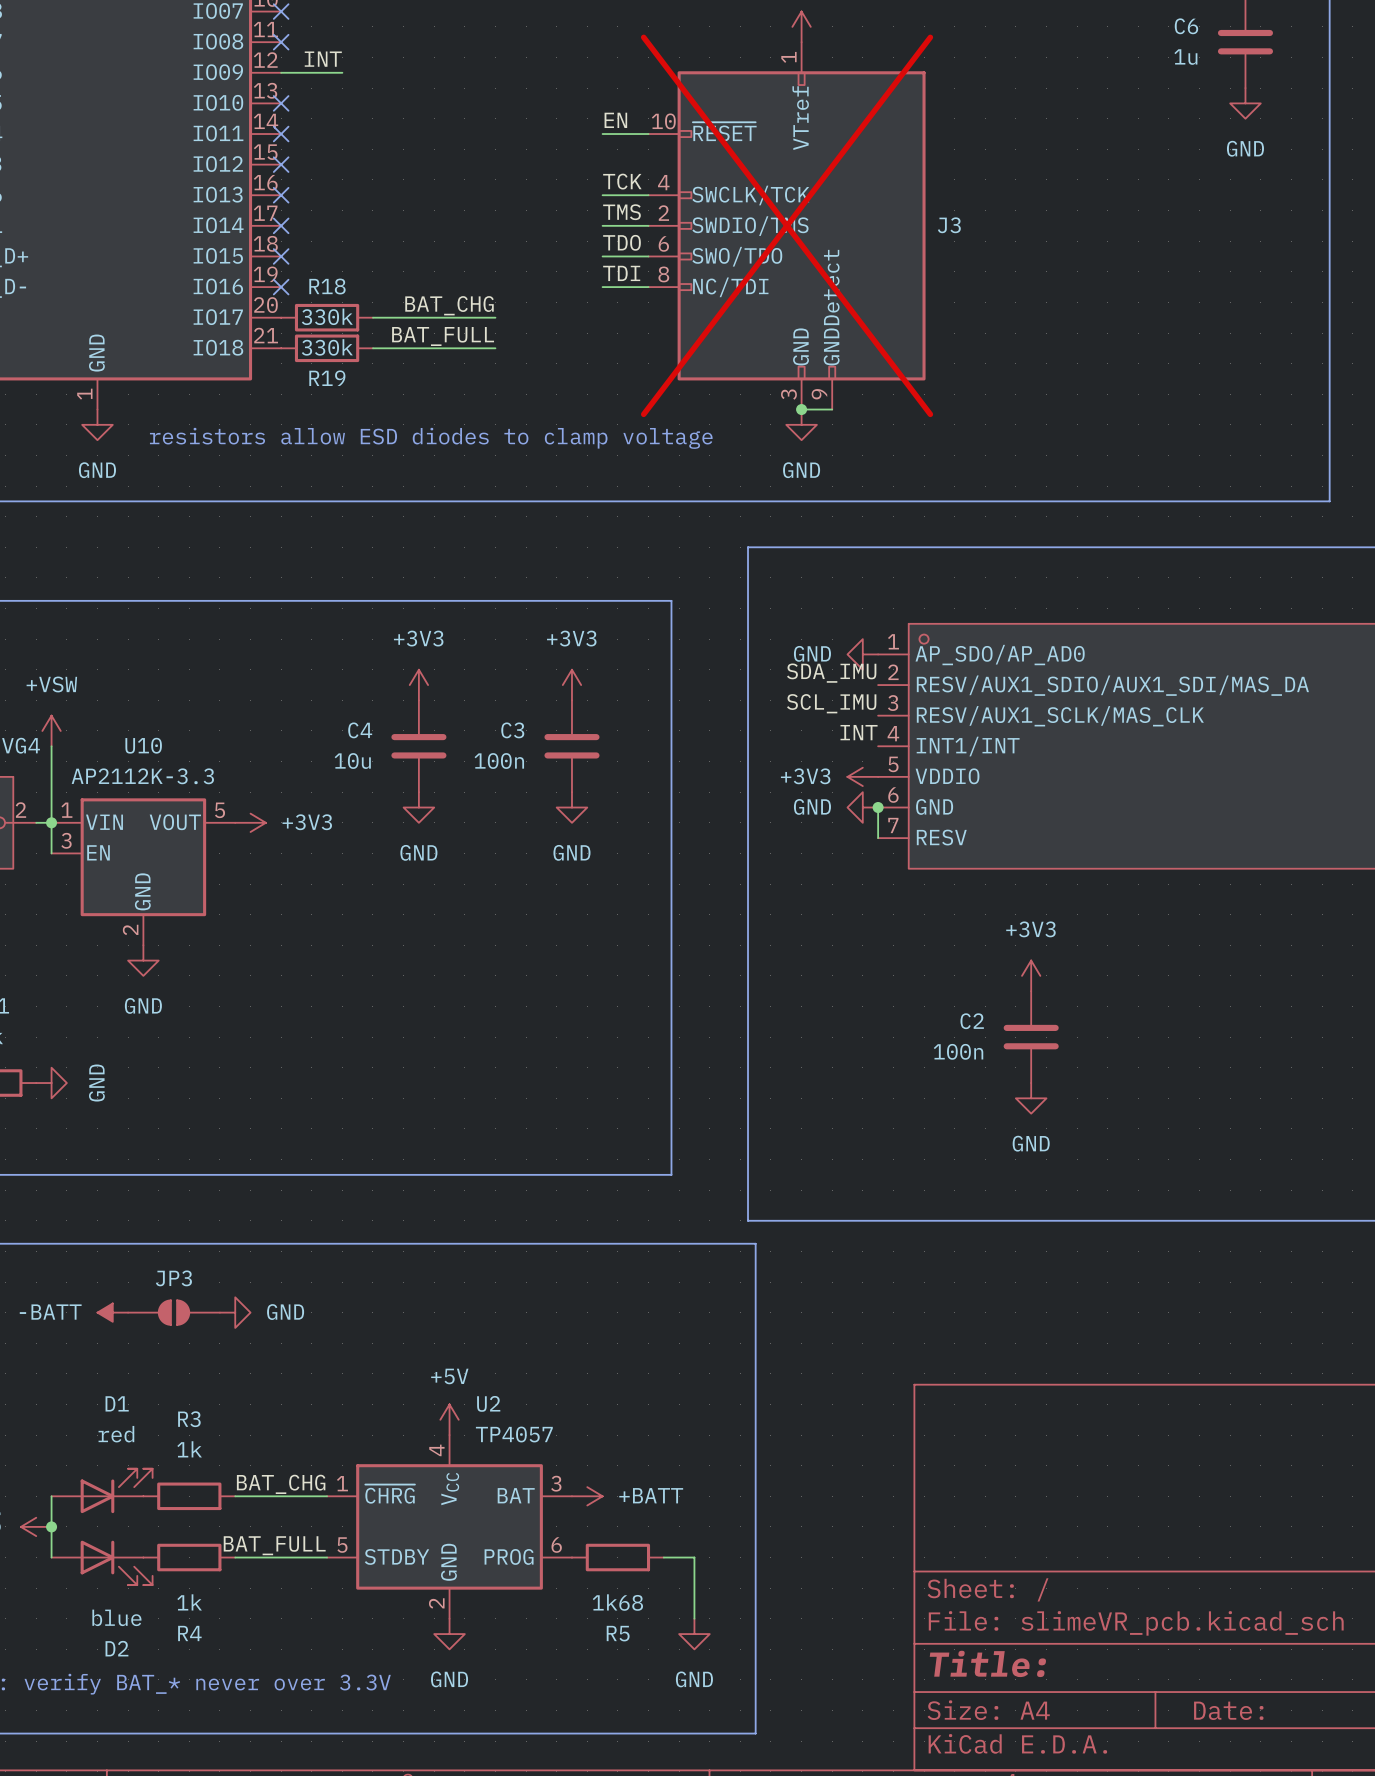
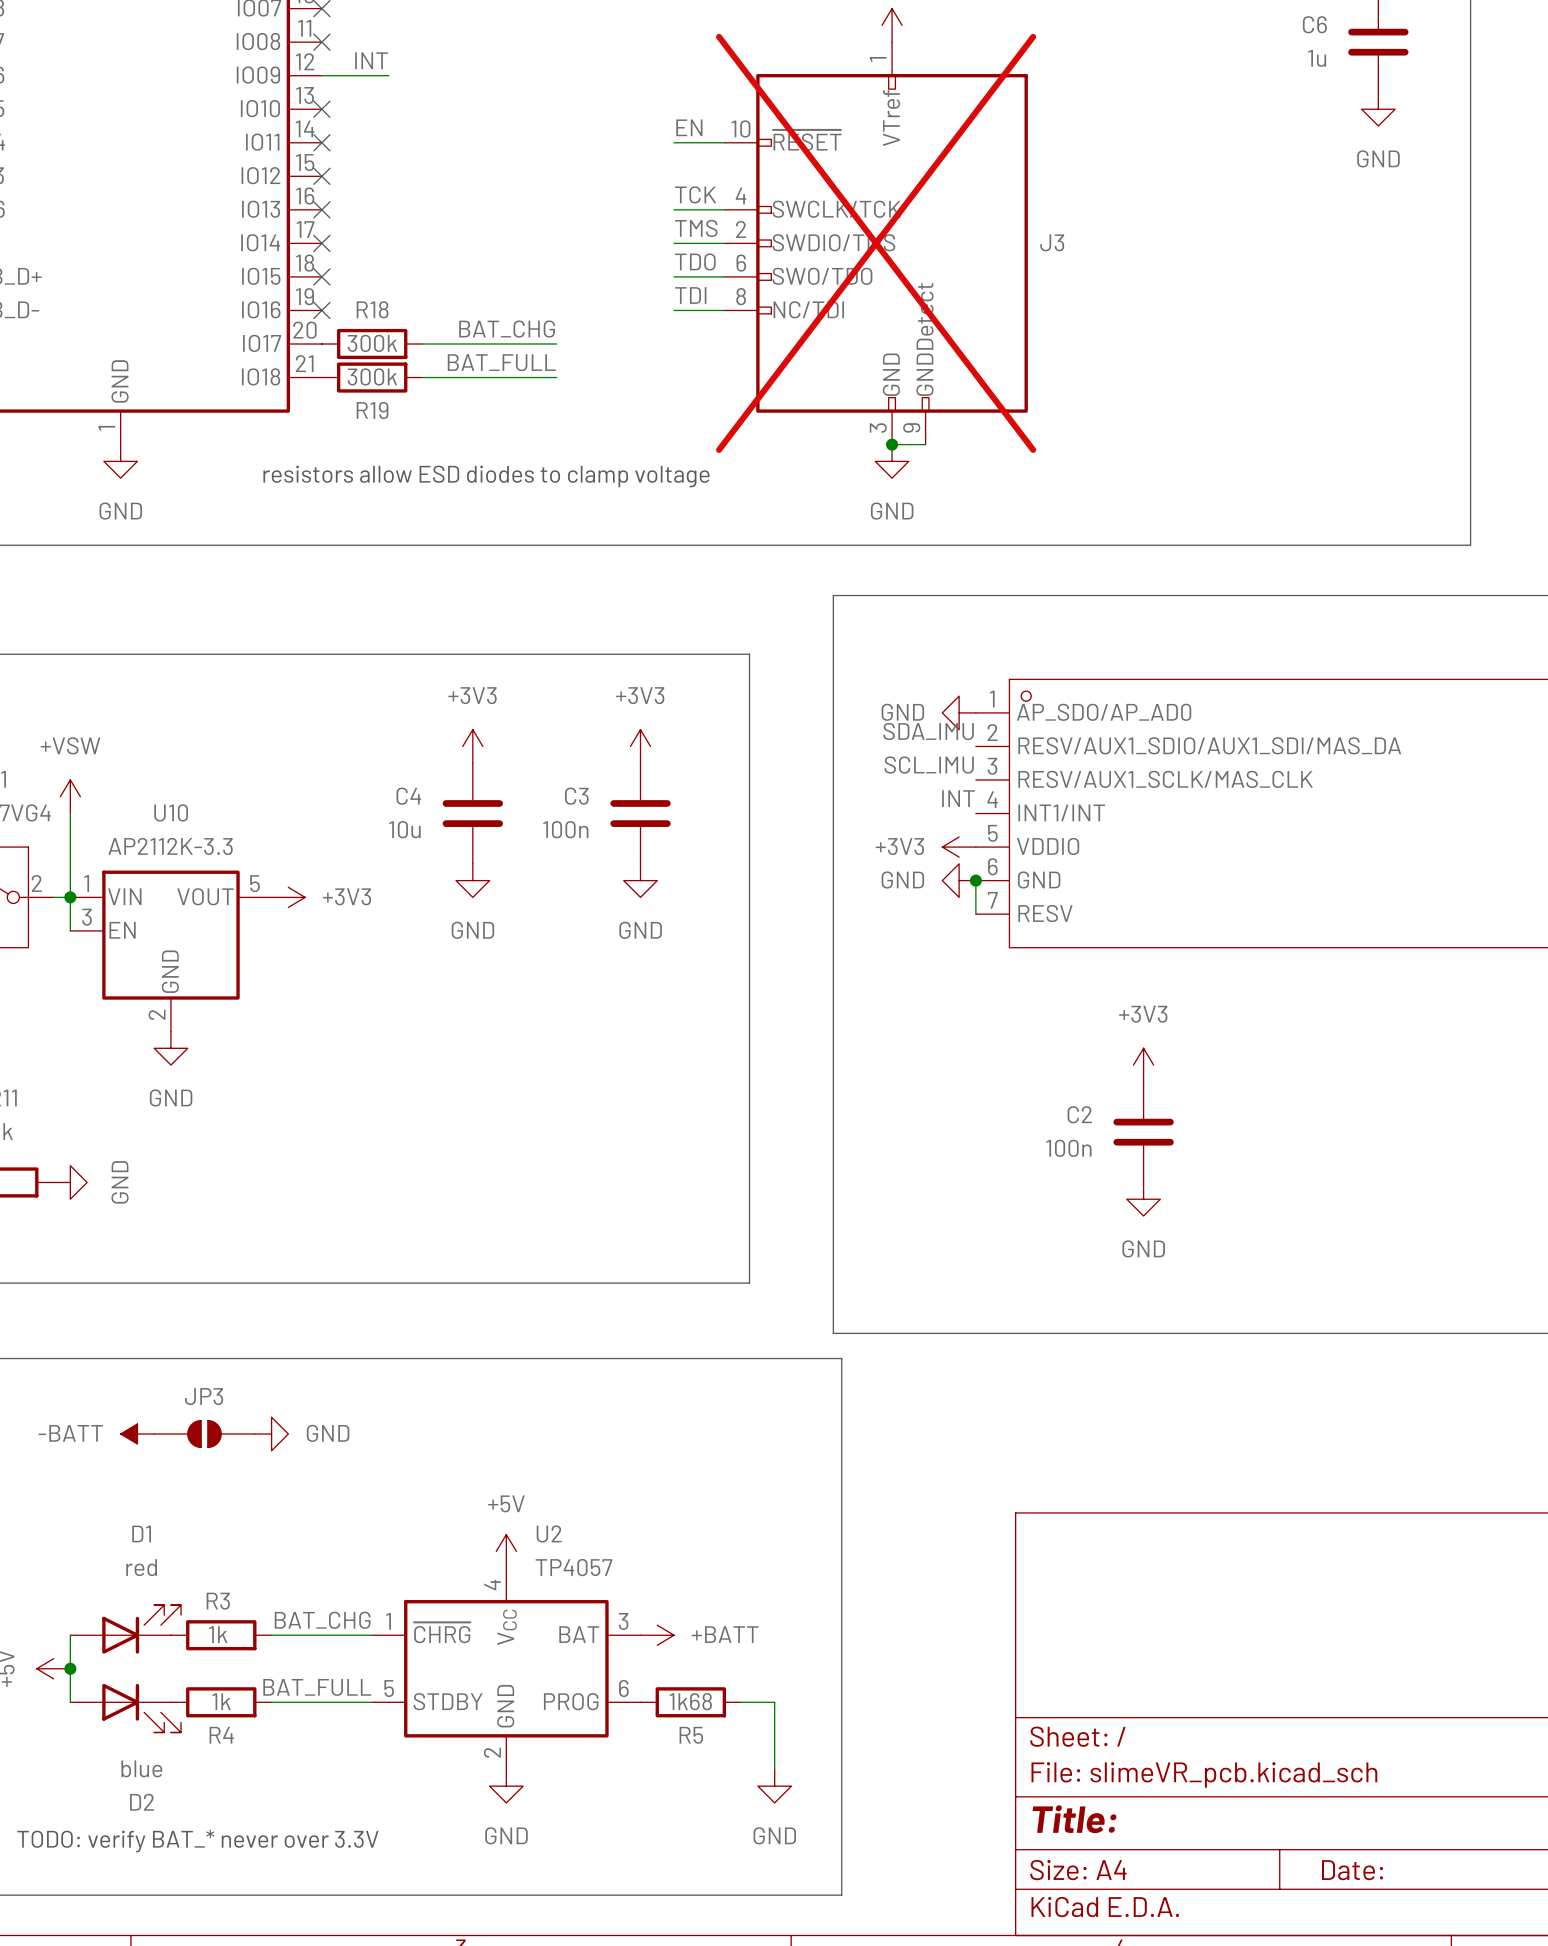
R18 value: 330k (327, 316) -> 300k (372, 343)
R19 value: 330k (327, 347) -> 300k (372, 376)
R3 name position: R3 (189, 1419) -> R3 (218, 1601)
R3 value position: 1k (189, 1449) -> 1k (218, 1634)
R4 value position: 1k (189, 1602) -> 1k (221, 1701)
R5 value position: 1k68 (617, 1602) -> 1k68 (690, 1701)
R4 name position: R4 (189, 1633) -> R4 (221, 1735)
R5 name position: R5 (618, 1633) -> R5 (691, 1735)

